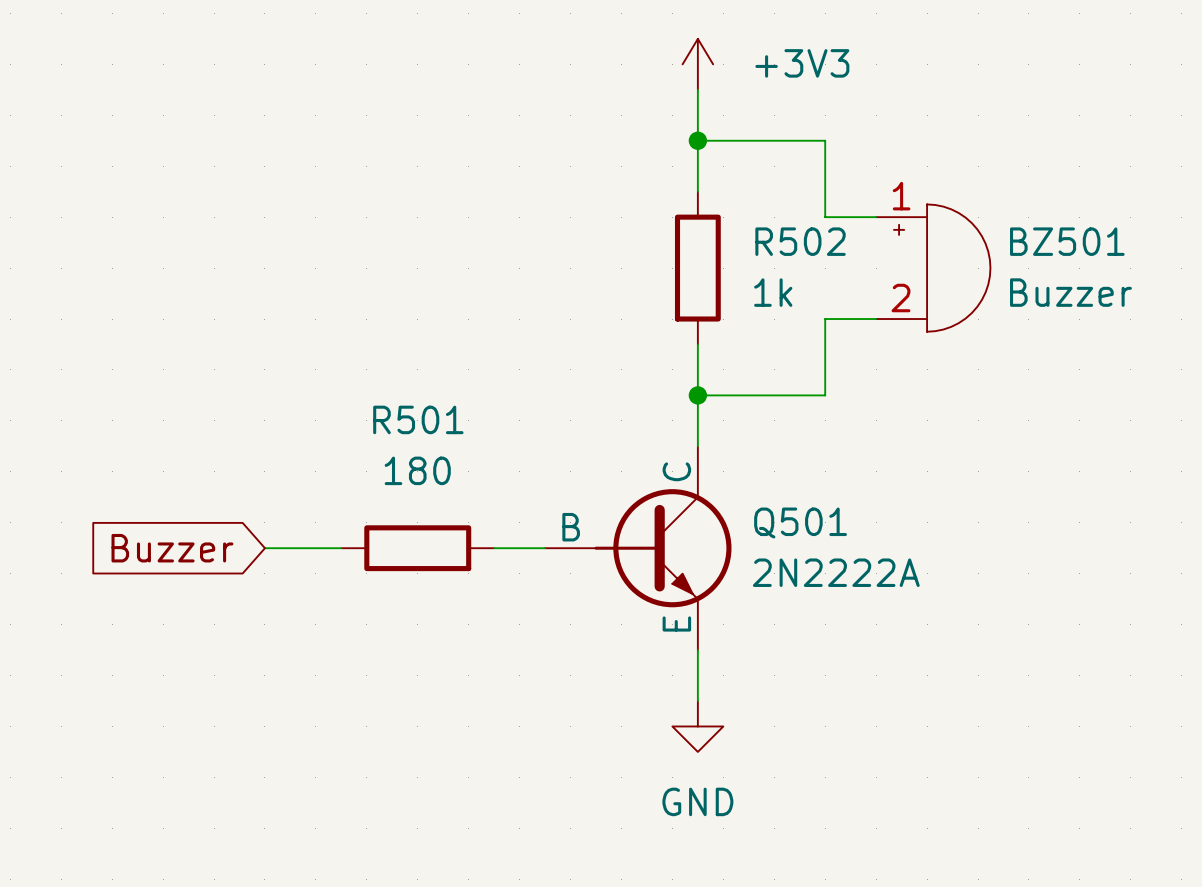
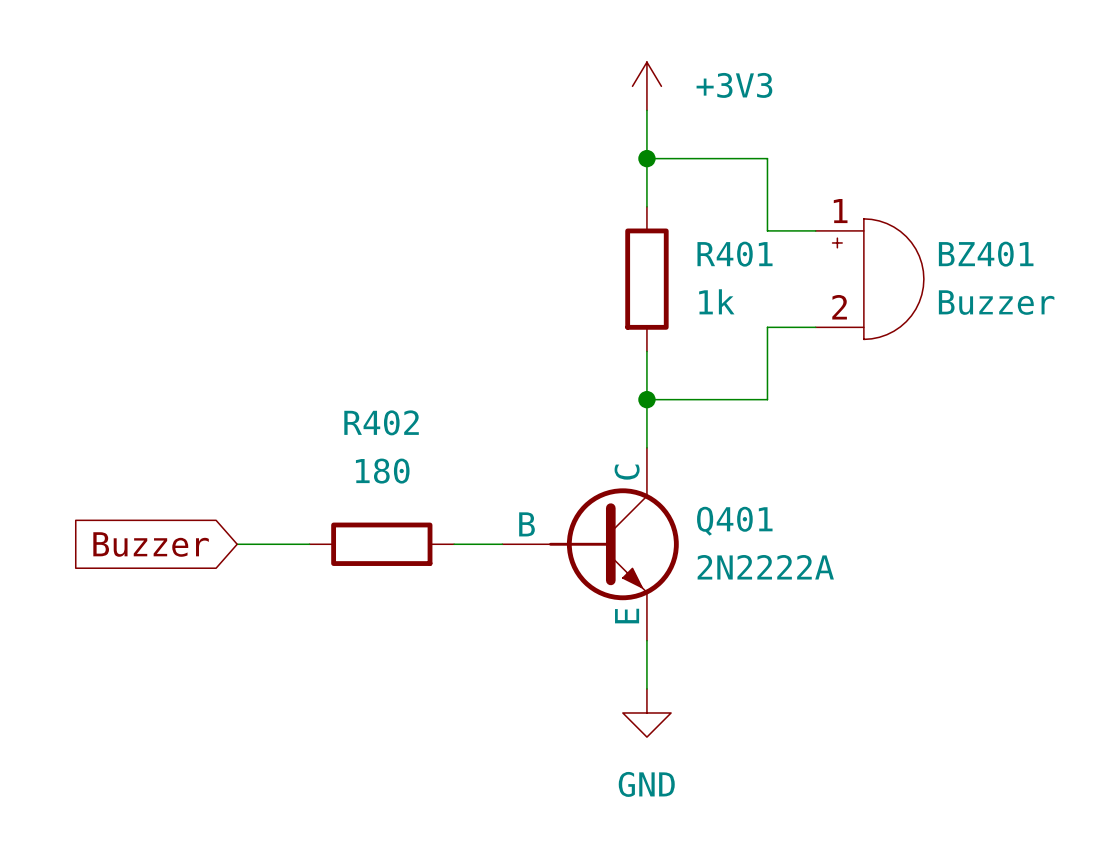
R502 name: R502 (800, 241) -> R401 (735, 254)
BZ501 name: BZ501 (1067, 241) -> BZ401 (986, 254)
R501 name: R501 (418, 419) -> R402 (381, 422)
Q501 name: Q501 (800, 523) -> Q401 (734, 521)

